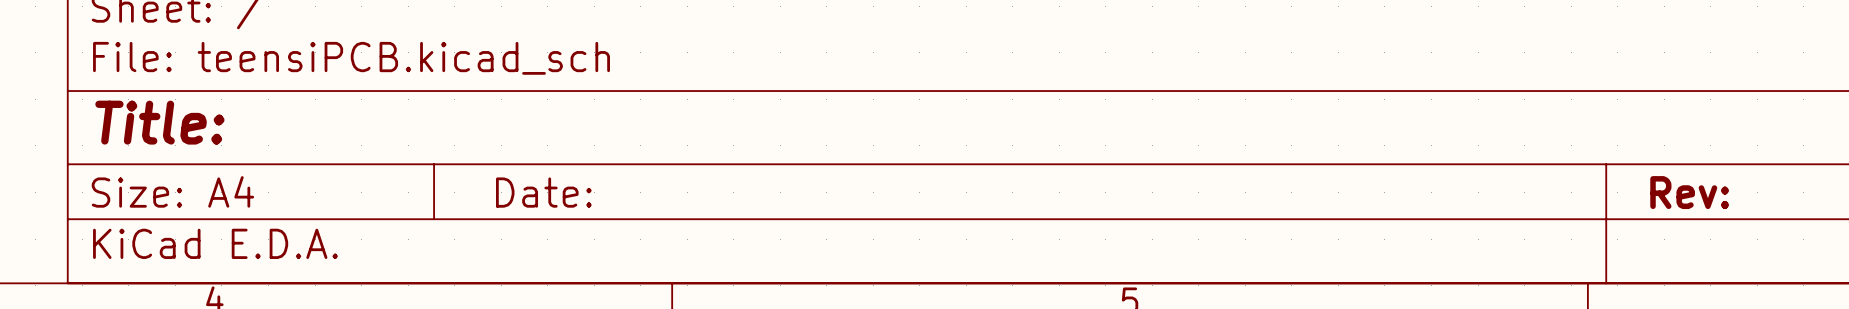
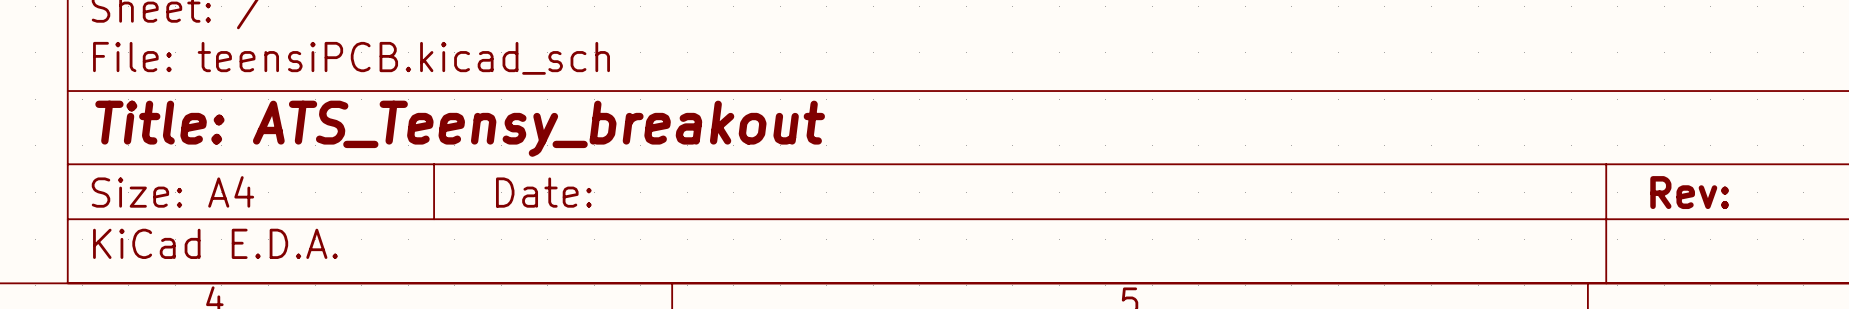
title block: Title: (159, 122) -> Title: ATS_Teensy_breakout (460, 128)

